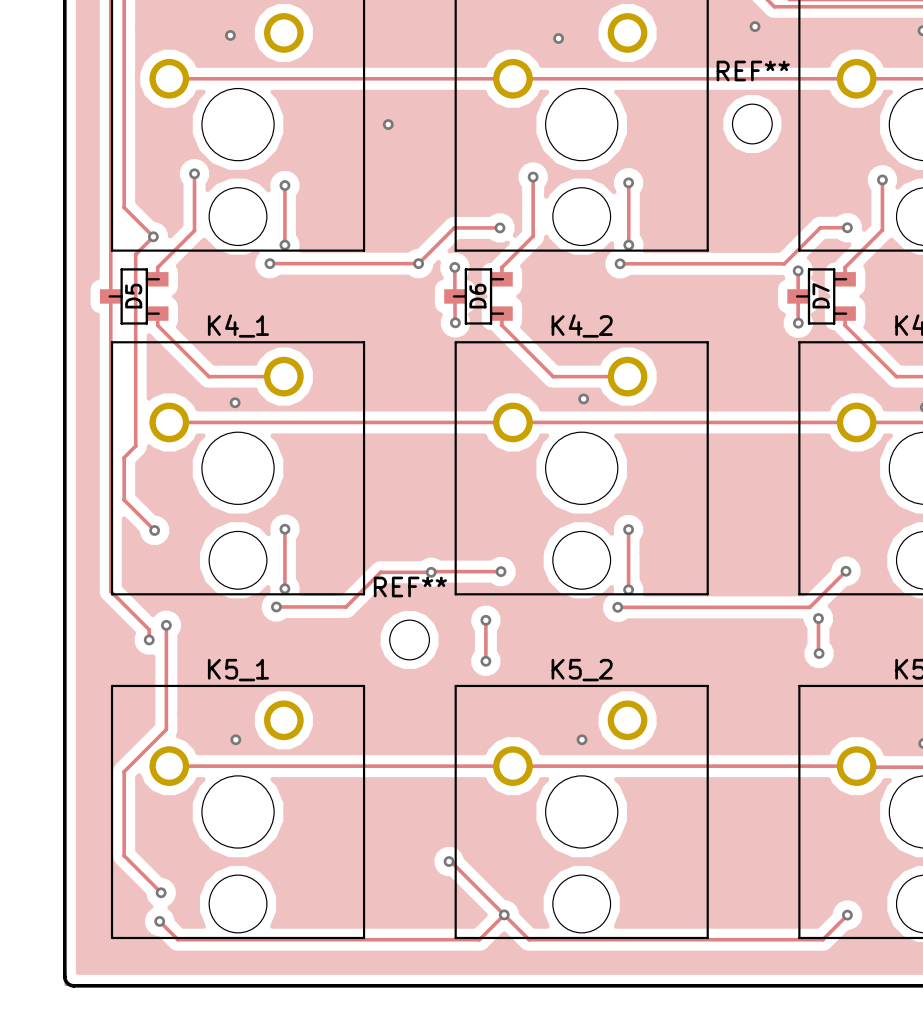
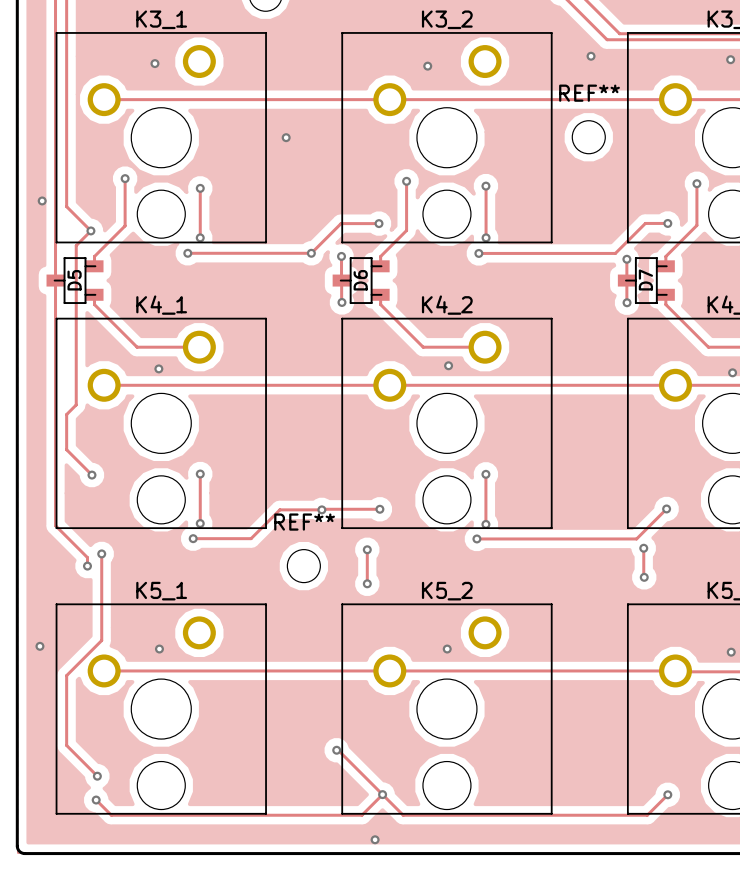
via: none -> (42, 200)
via: none -> (39, 646)
via: none -> (375, 839)

